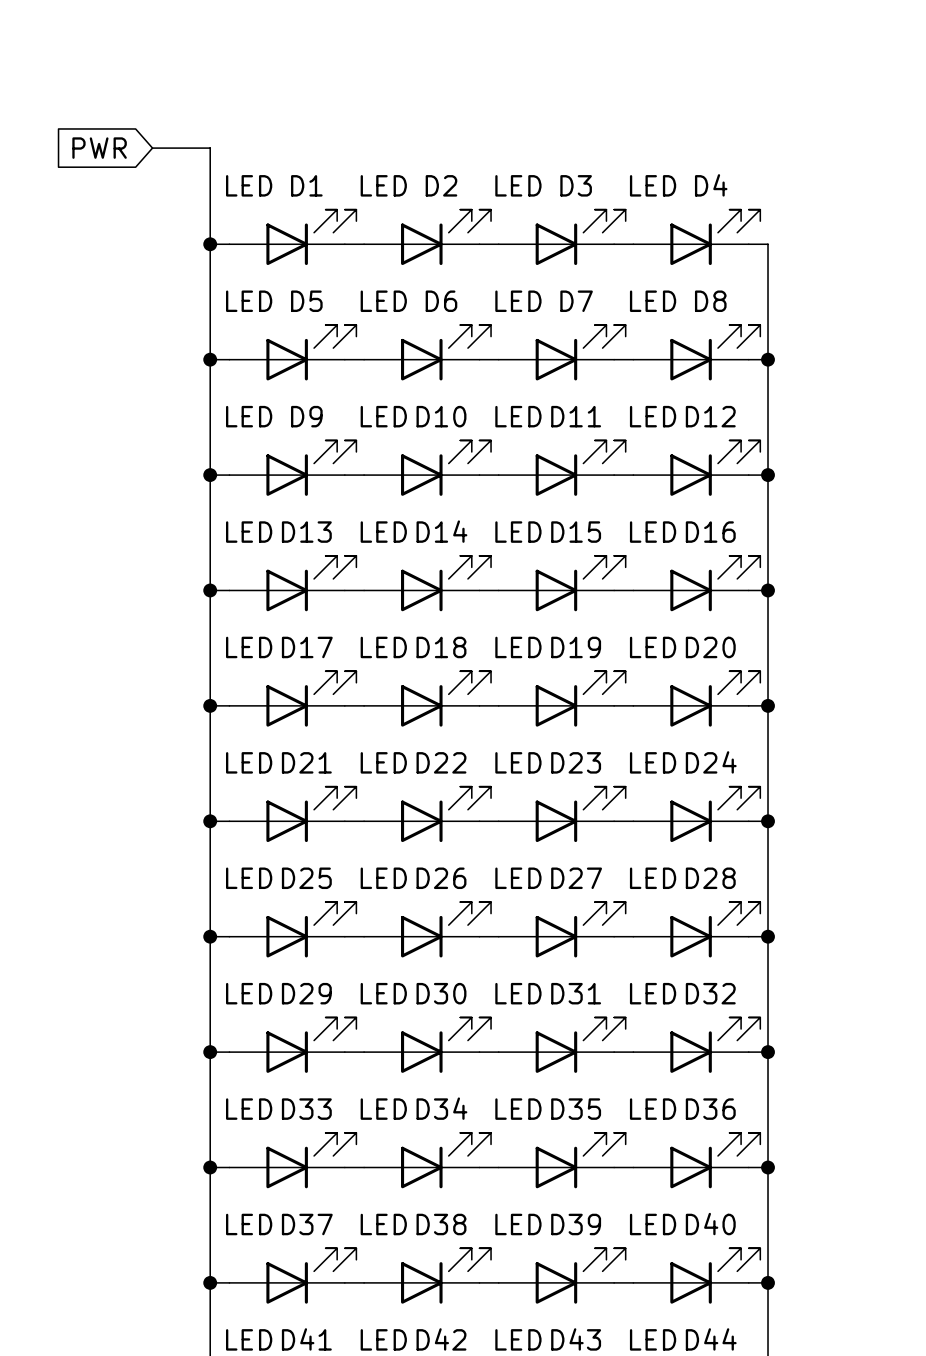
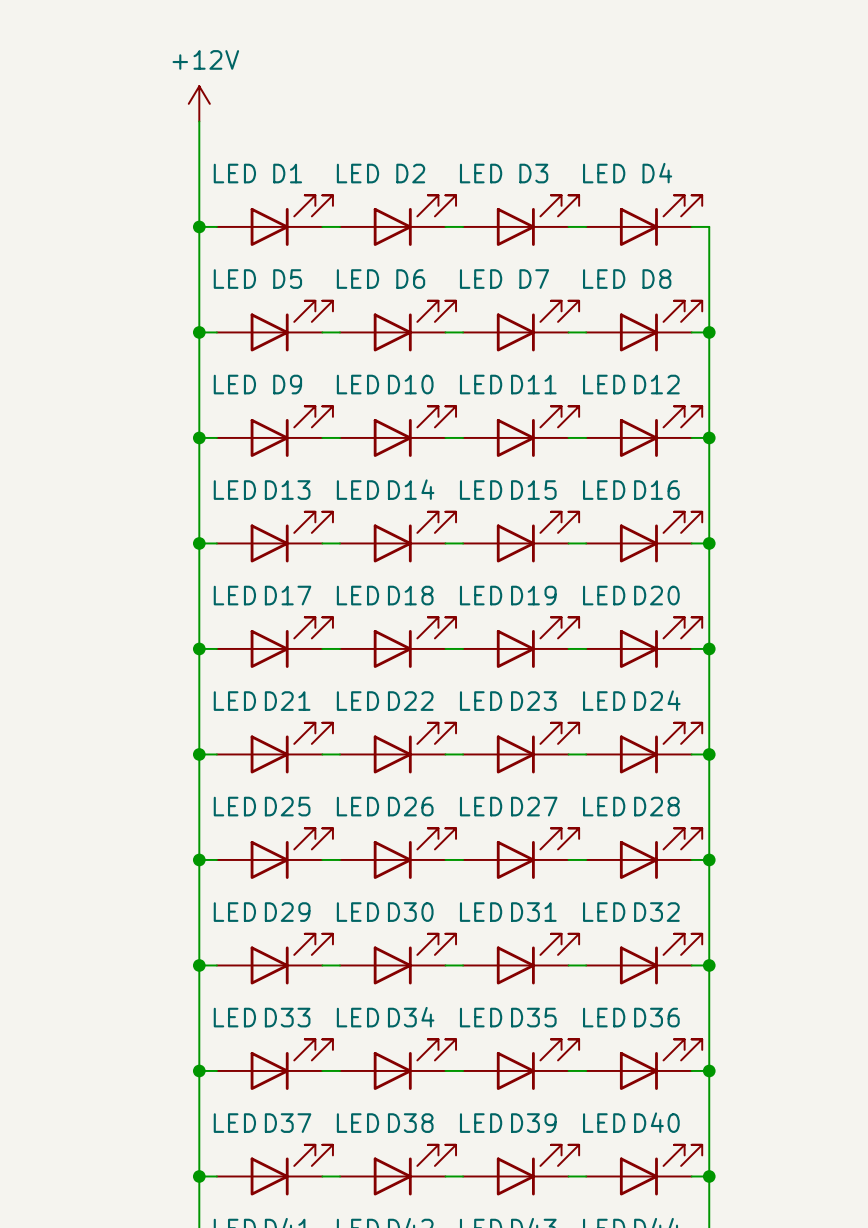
power symbol: none -> +12V (199, 103)
global label: PWR (99, 148) -> none
wire: (152, 148) (210, 148) -> (199, 121) (199, 139)

